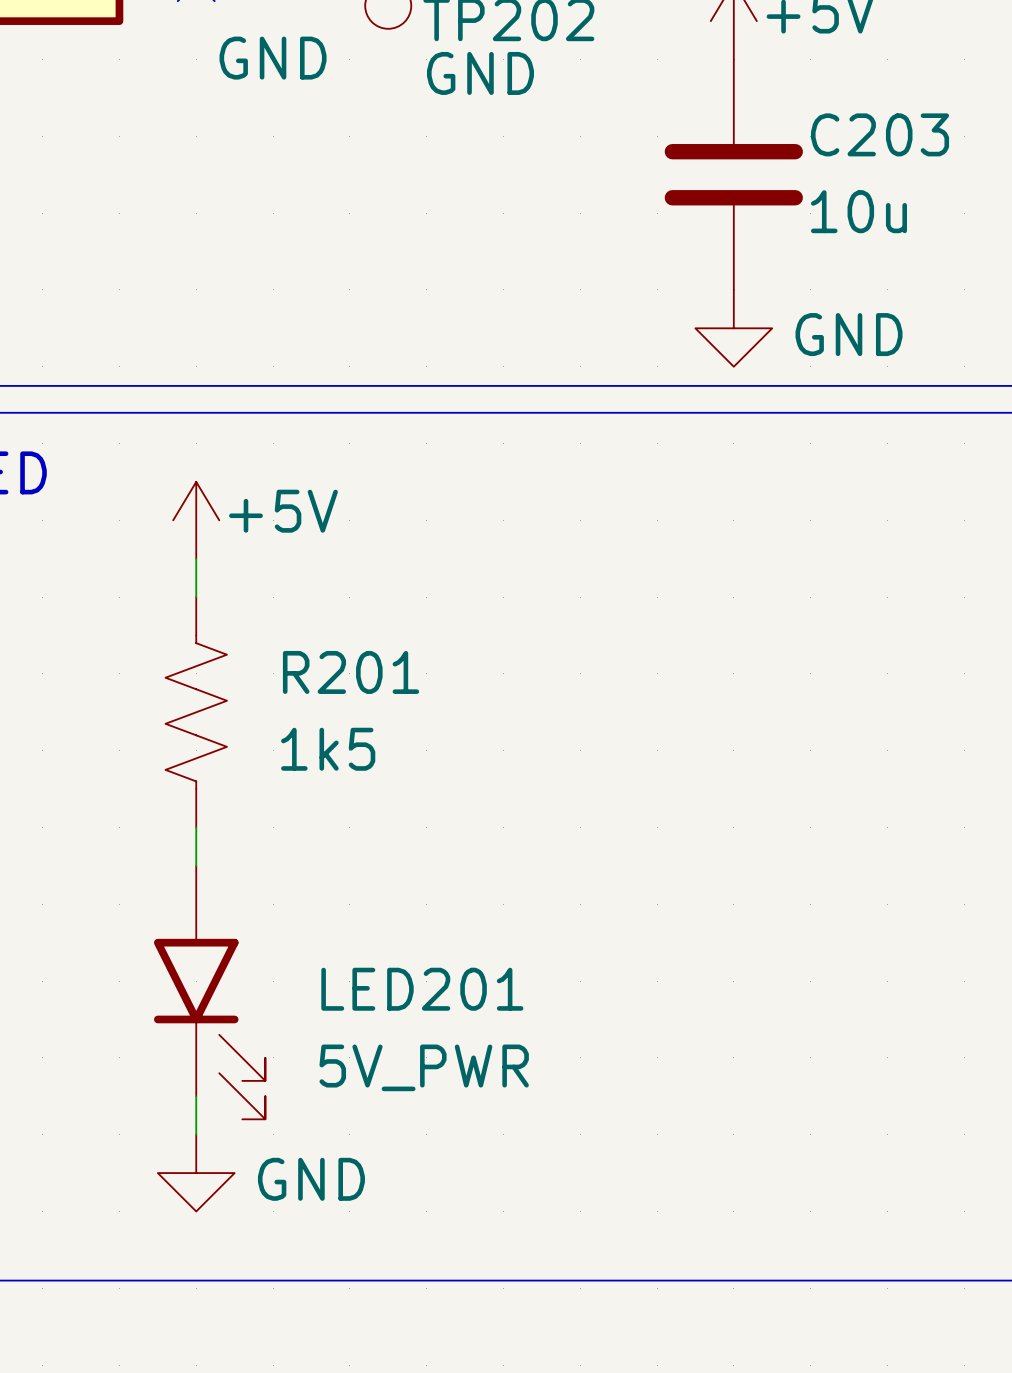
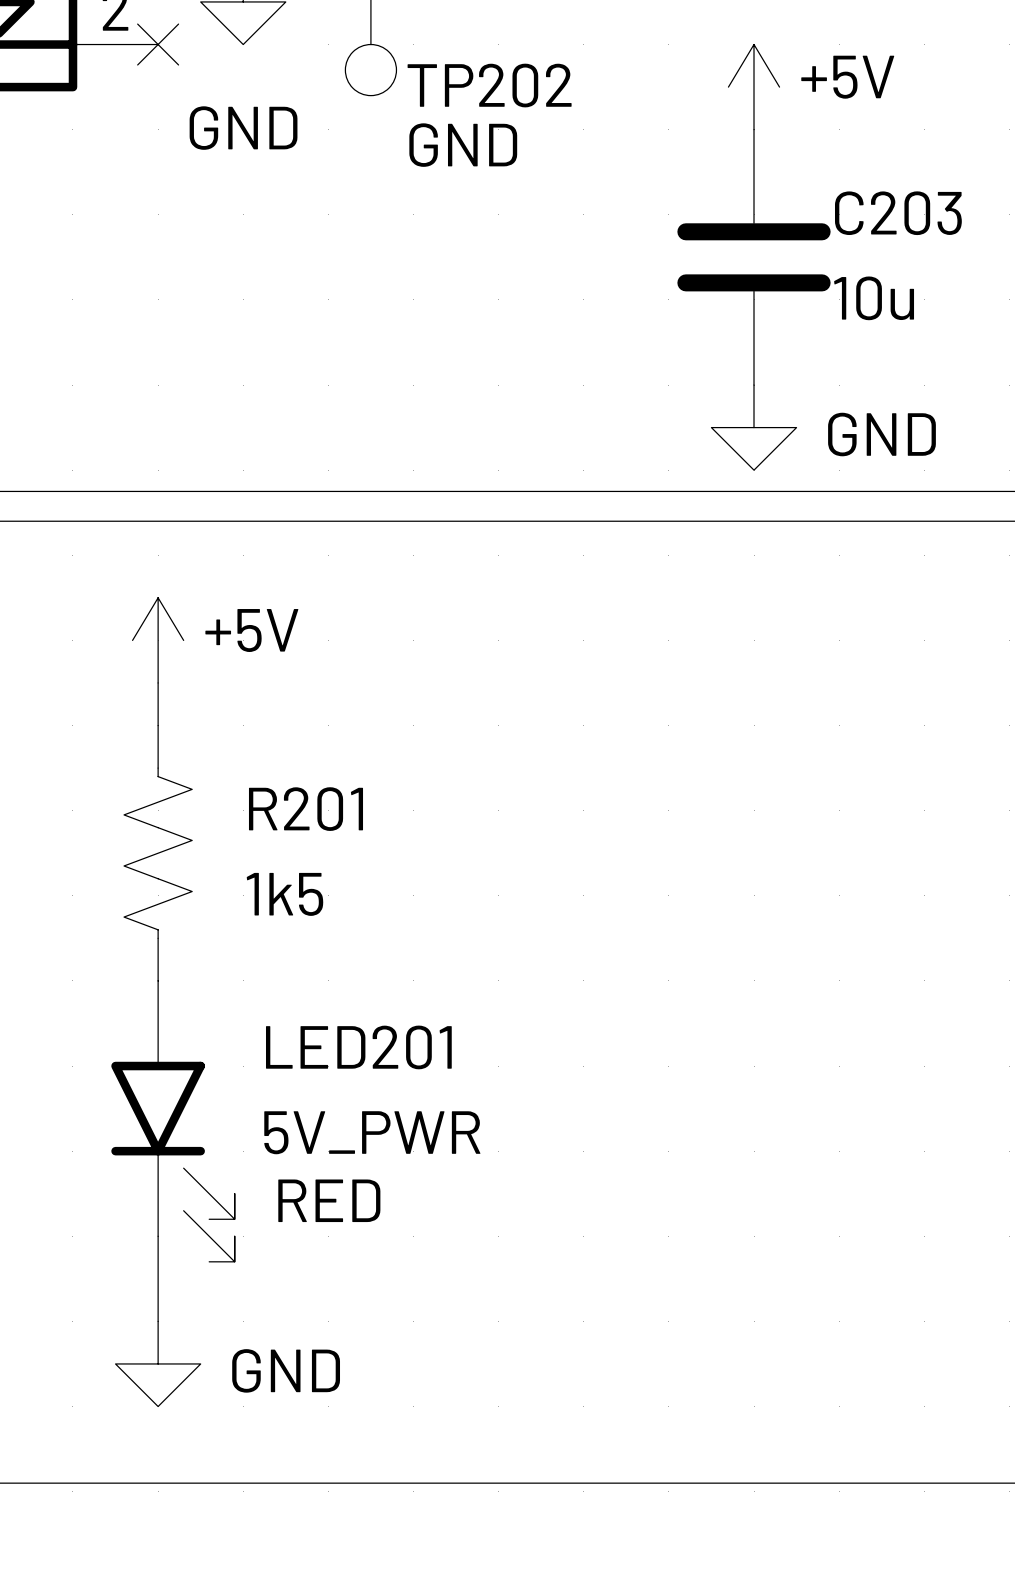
LED201 name position: LED201 (422, 989) -> LED201 (358, 1047)
LED201 position: (209, 992) -> (173, 1121)
text: none -> RED (329, 1200)
LED201 value position: 5V_PWR (424, 1067) -> 5V_PWR (372, 1132)

